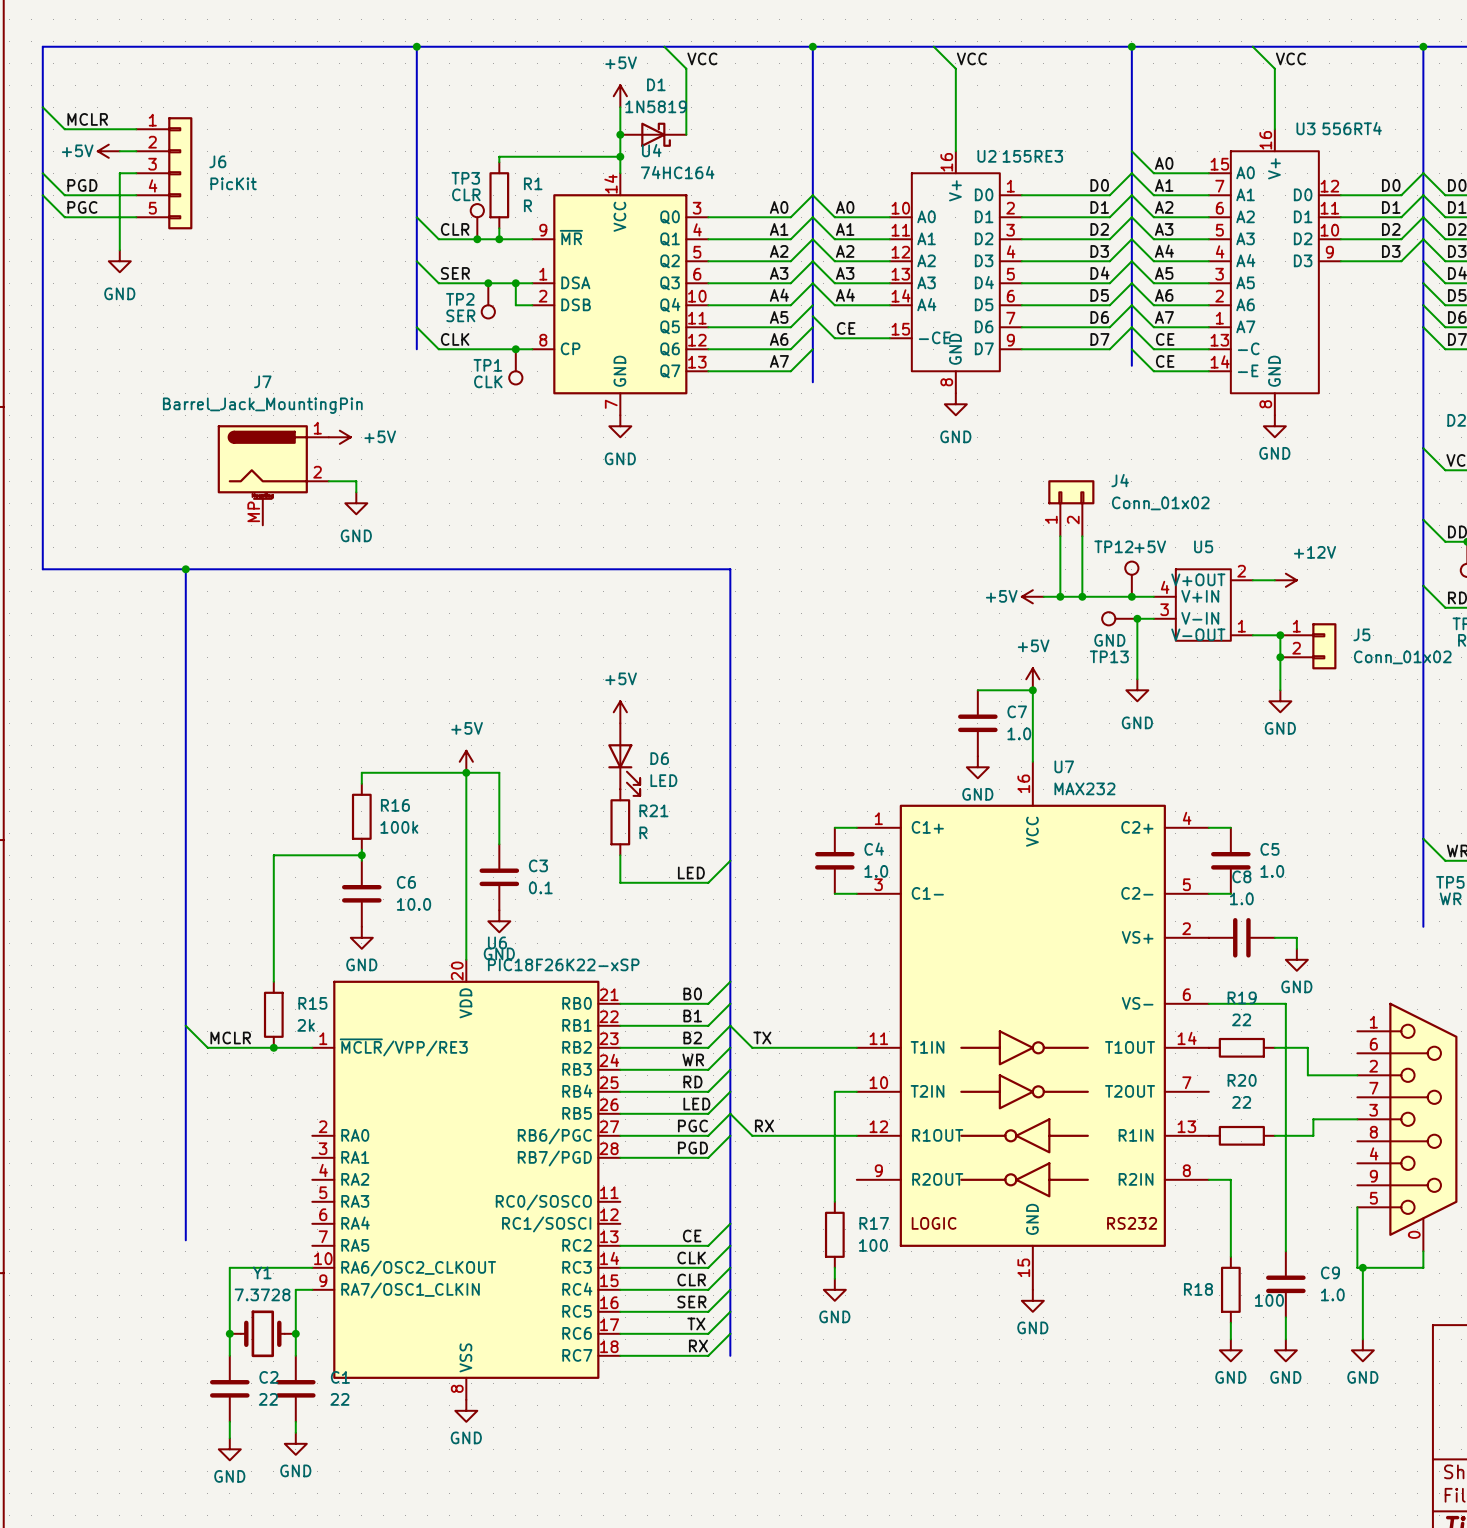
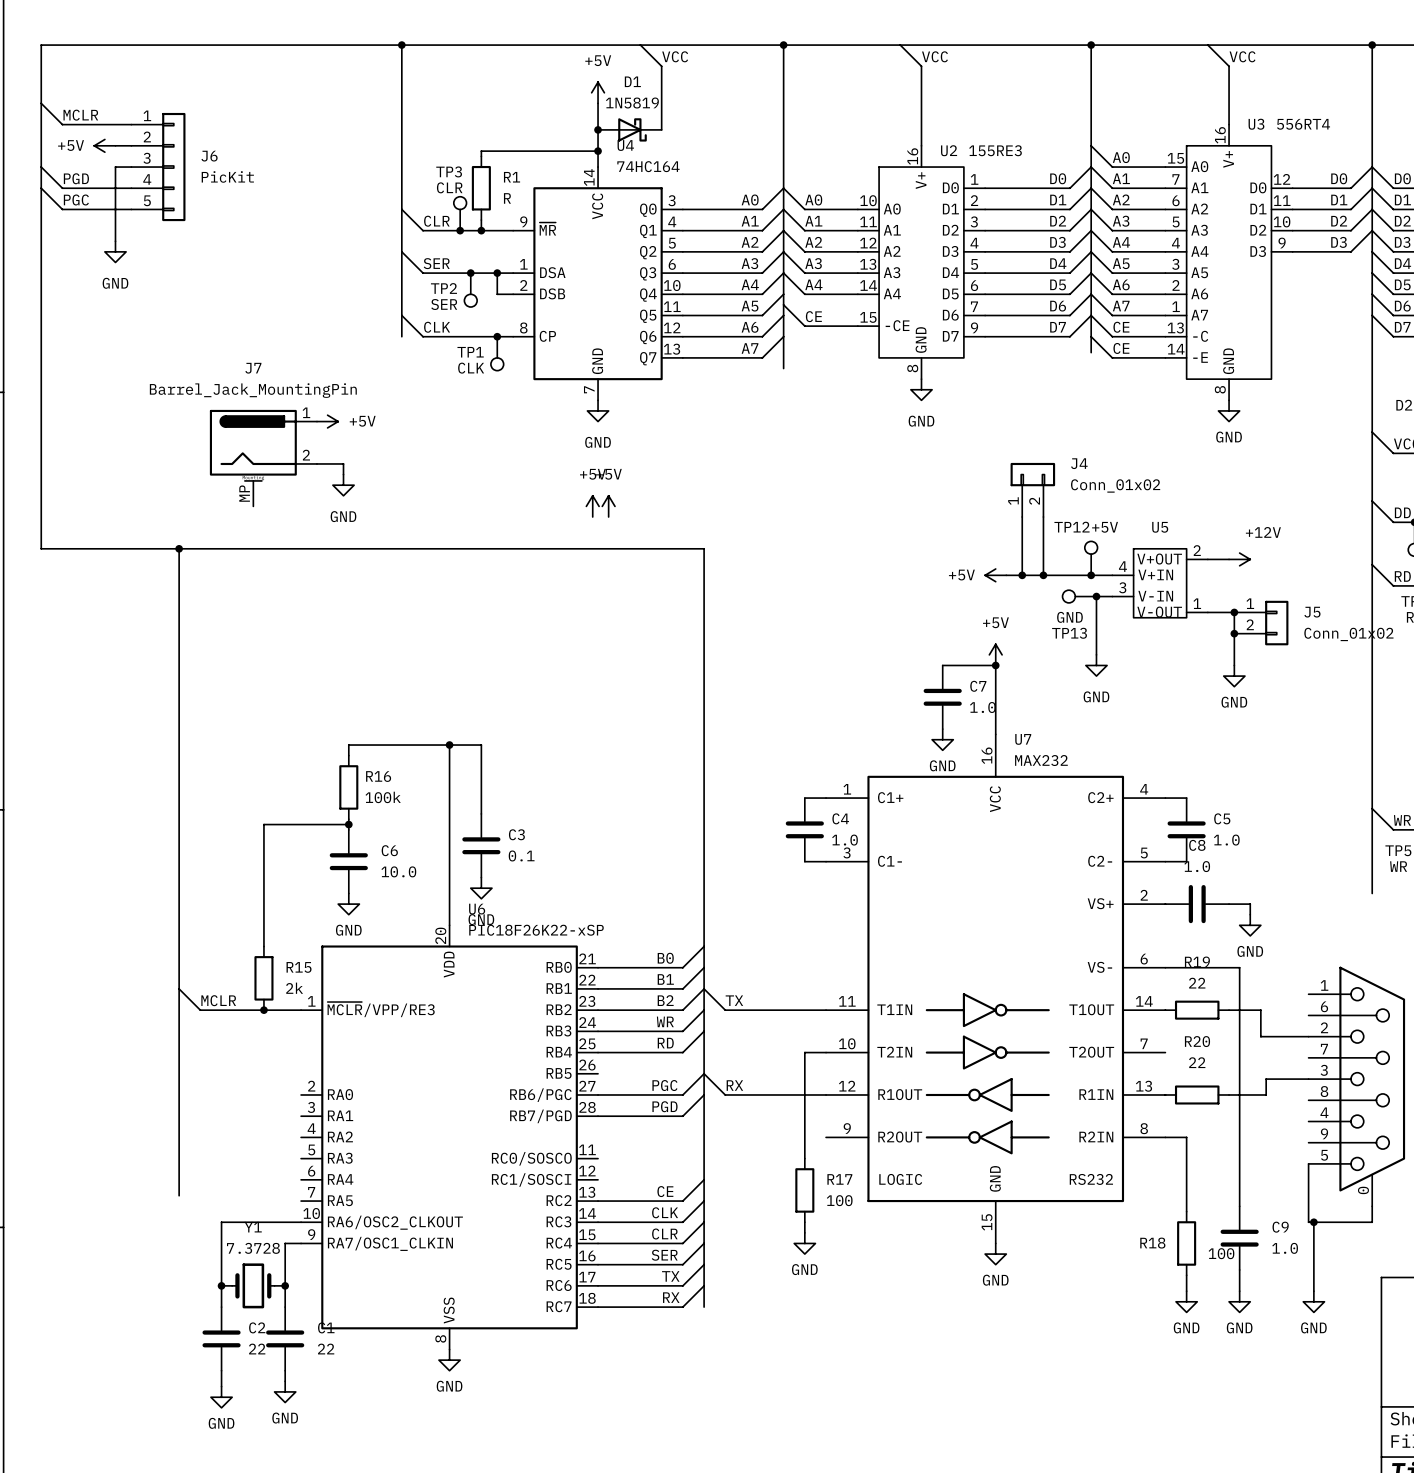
power symbol: none -> +5V (592, 506)
power symbol: none -> +5V (608, 506)
power symbol: +5V (620, 712) -> none
D6: LED (624, 759) -> none
power symbol: +5V (466, 761) -> none
R21: R (620, 822) -> none
wire: (620, 855) (620, 882) (708, 882) (730, 860) -> none
label: LED (691, 872) -> none
wire: (730, 1091) (708, 1113) (620, 1113) -> none
label: LED (696, 1103) -> none

